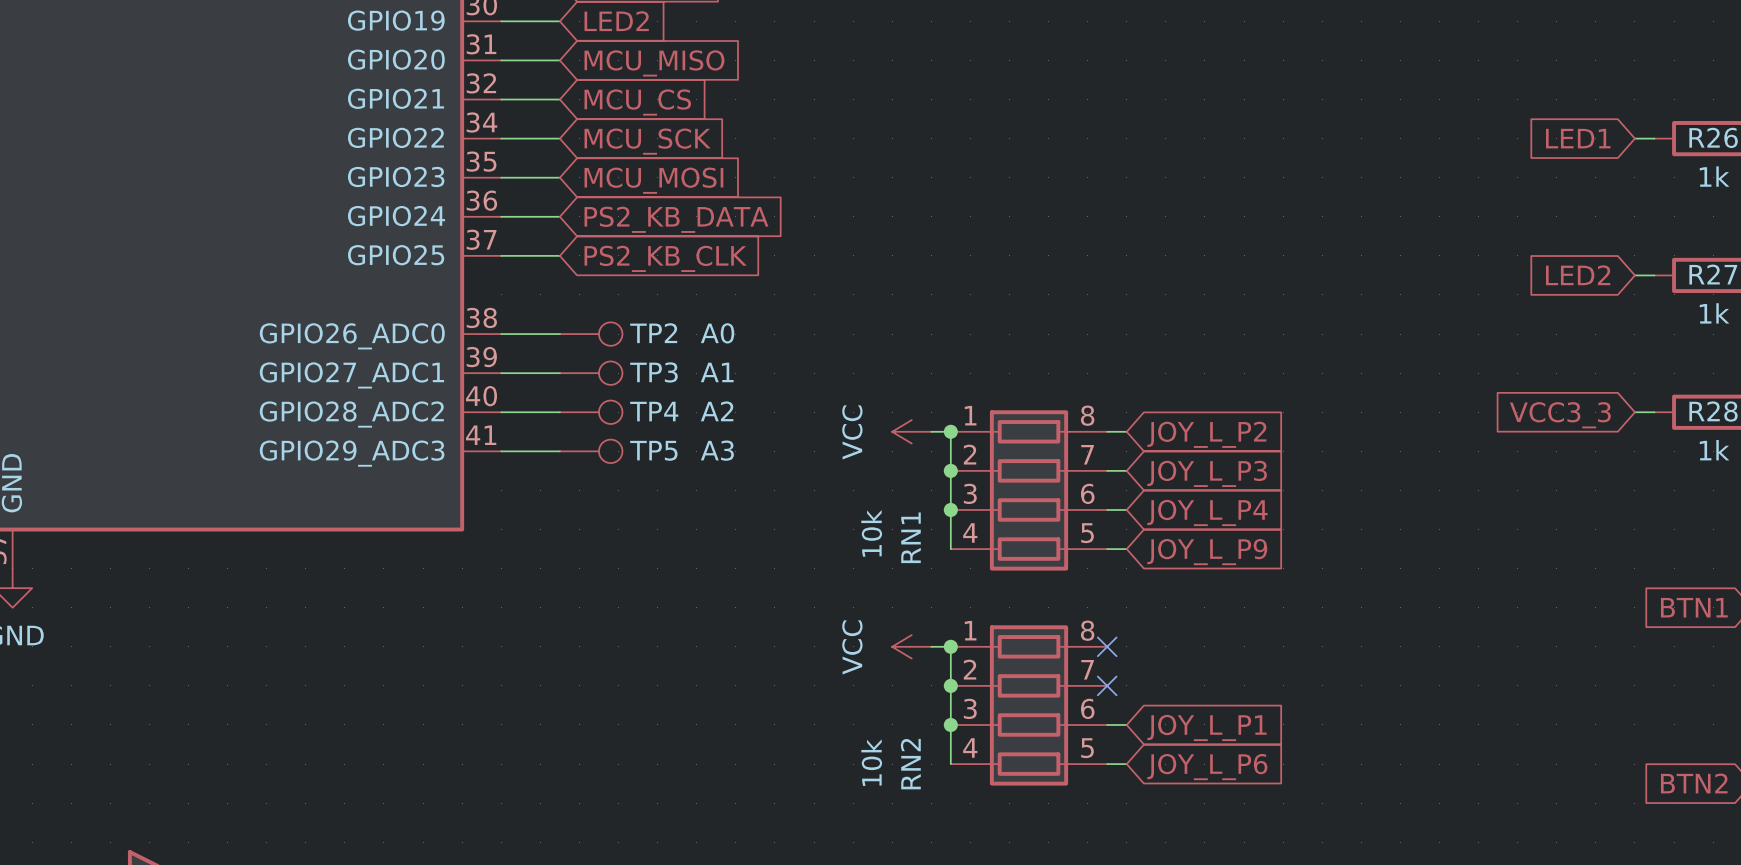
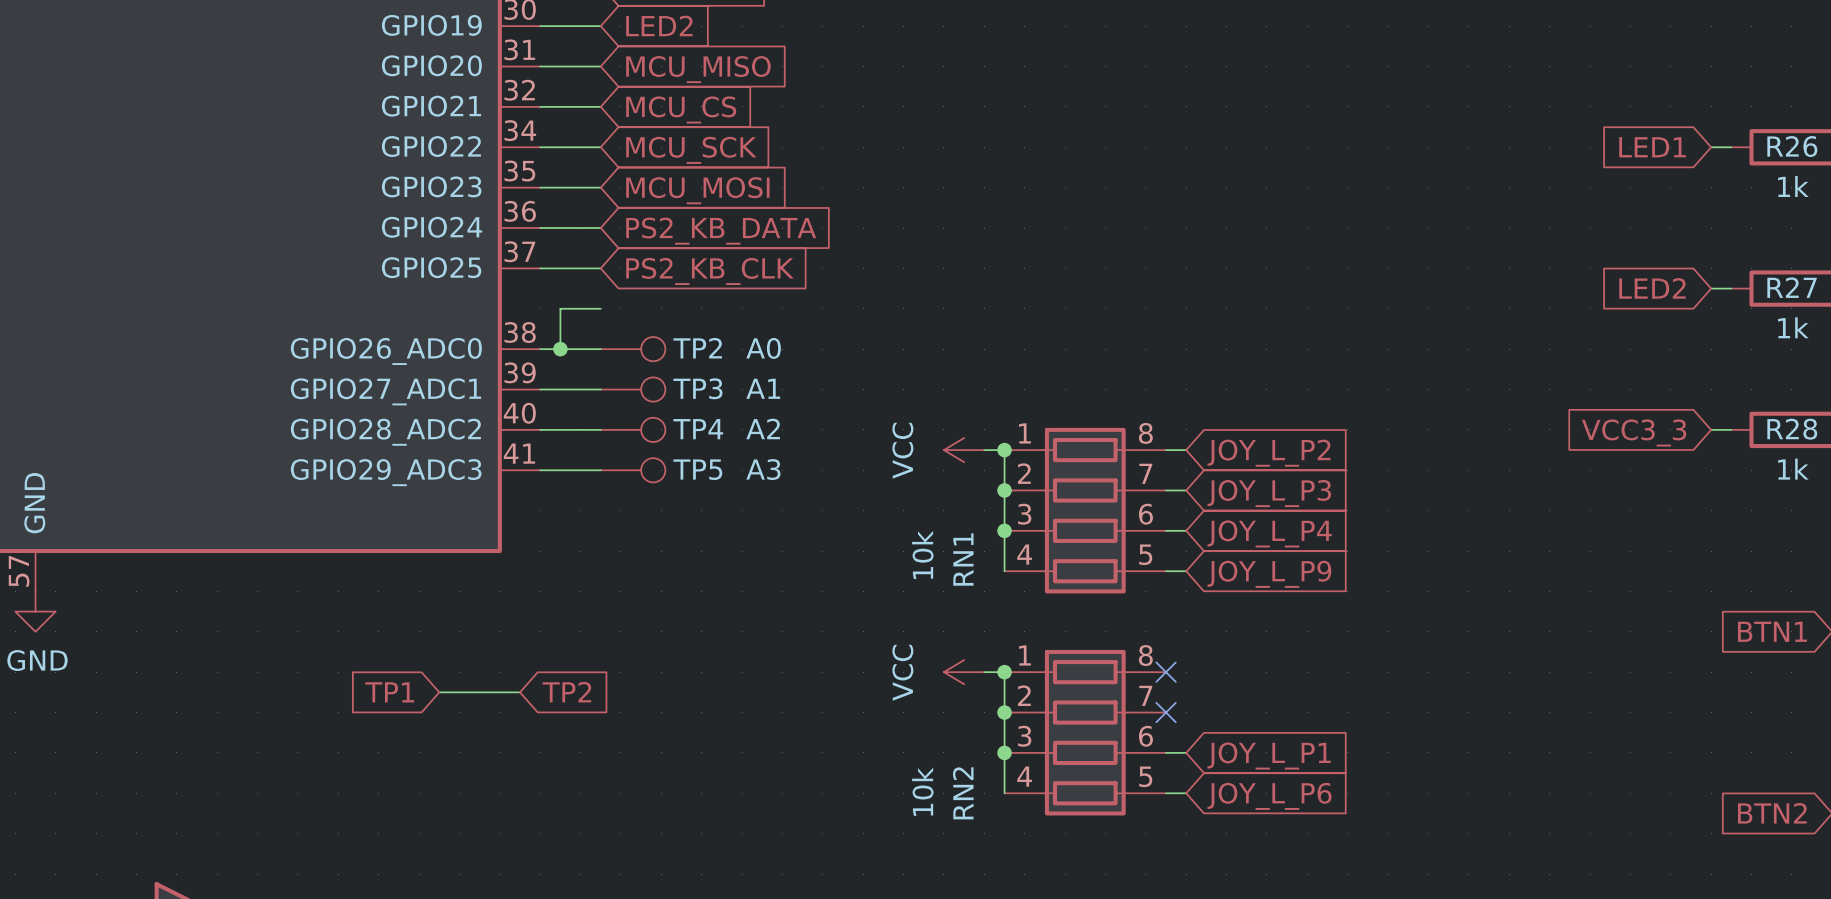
wire: none -> (600, 308) (560, 308) (560, 349)
junction: none -> (560, 349)
global label: none -> TP1 (389, 692)
wire: none -> (439, 692) (520, 692)
global label: none -> TP2 (566, 692)

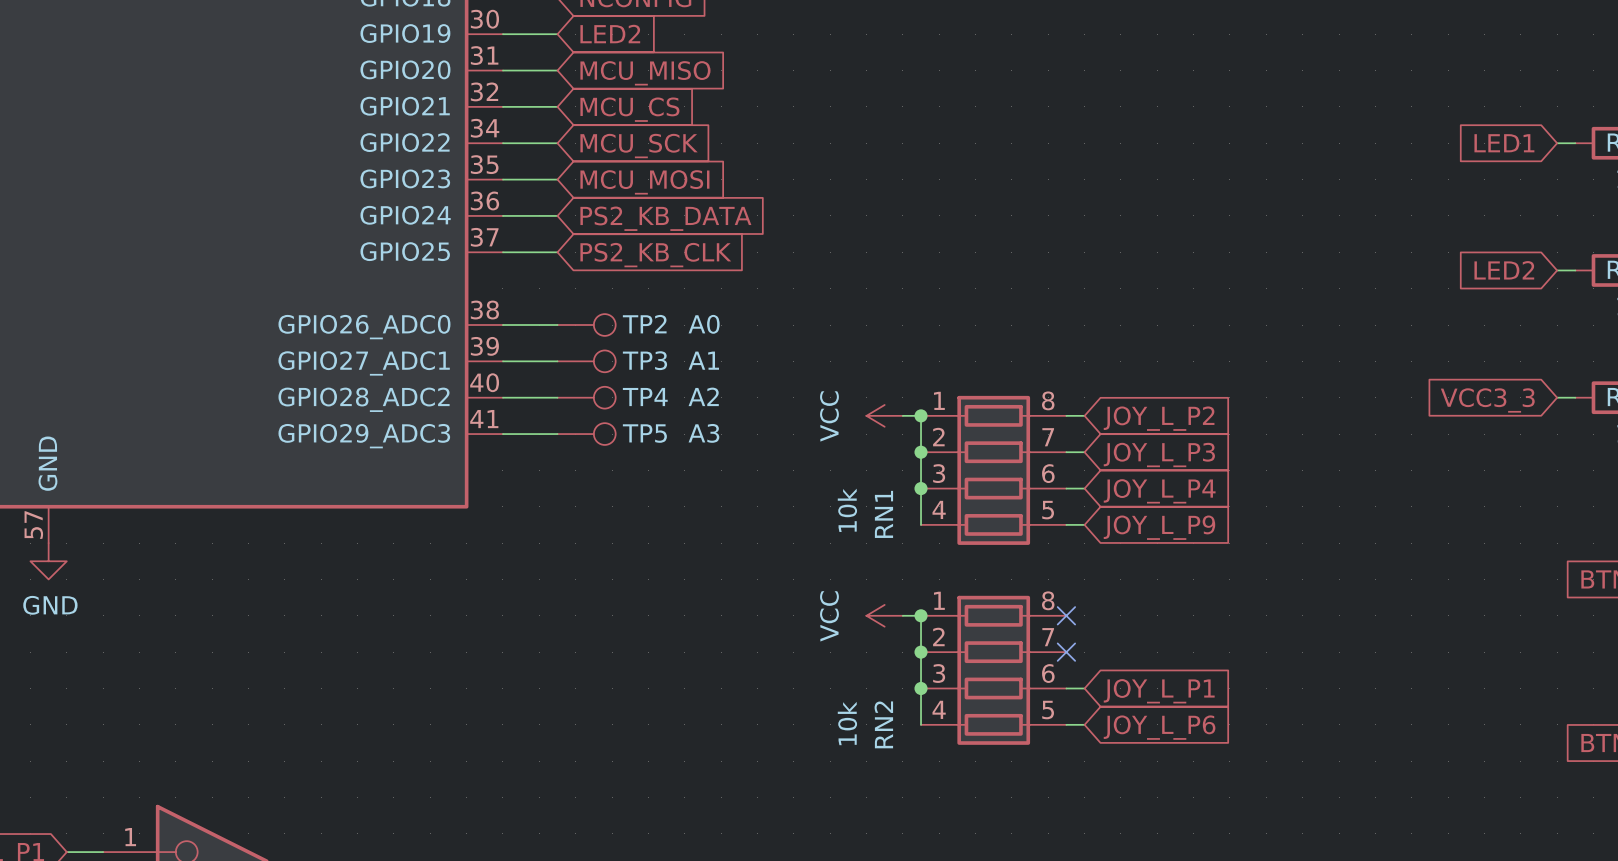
wire: (600, 308) (560, 308) (560, 349) -> none
junction: (560, 349) -> none
global label: TP1 (389, 692) -> none
wire: (439, 692) (520, 692) -> none
global label: TP2 (566, 692) -> none

